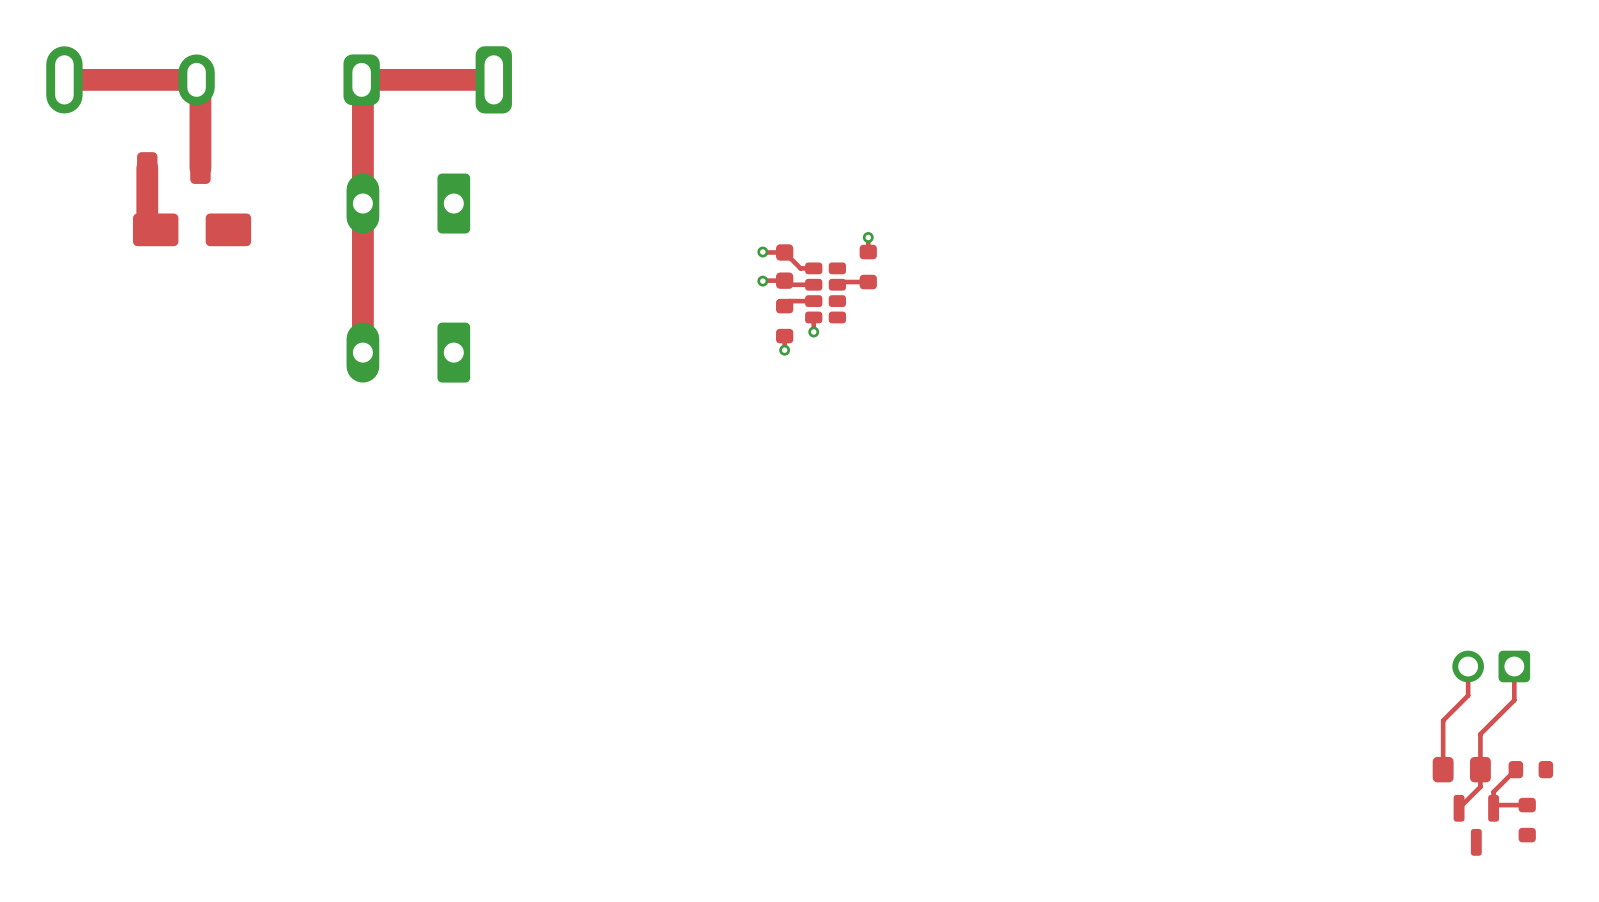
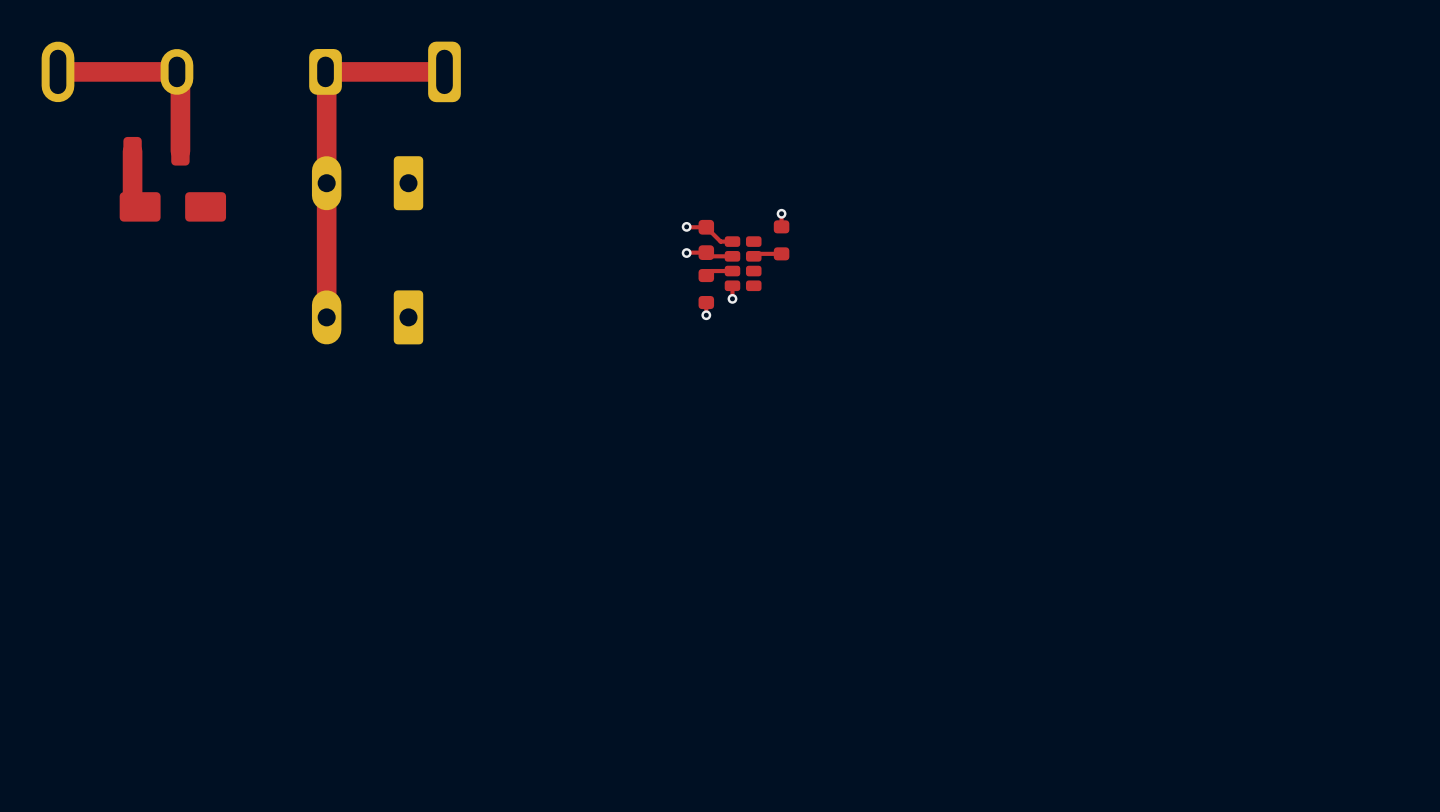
top track: (1468, 666) (1468, 695) (1443, 720) (1443, 769) -> none
part: (1491, 666) -> none
top track: (1514, 666) (1514, 700) (1480, 734) (1480, 786) (1459, 808) -> none
part: (1461, 769) -> none
top track: (1515, 769) (1493, 791) (1493, 808) (1496, 805) (1527, 805) -> none
part: (1530, 769) -> none
part: (1527, 820) -> none
part: (1476, 825) -> none

